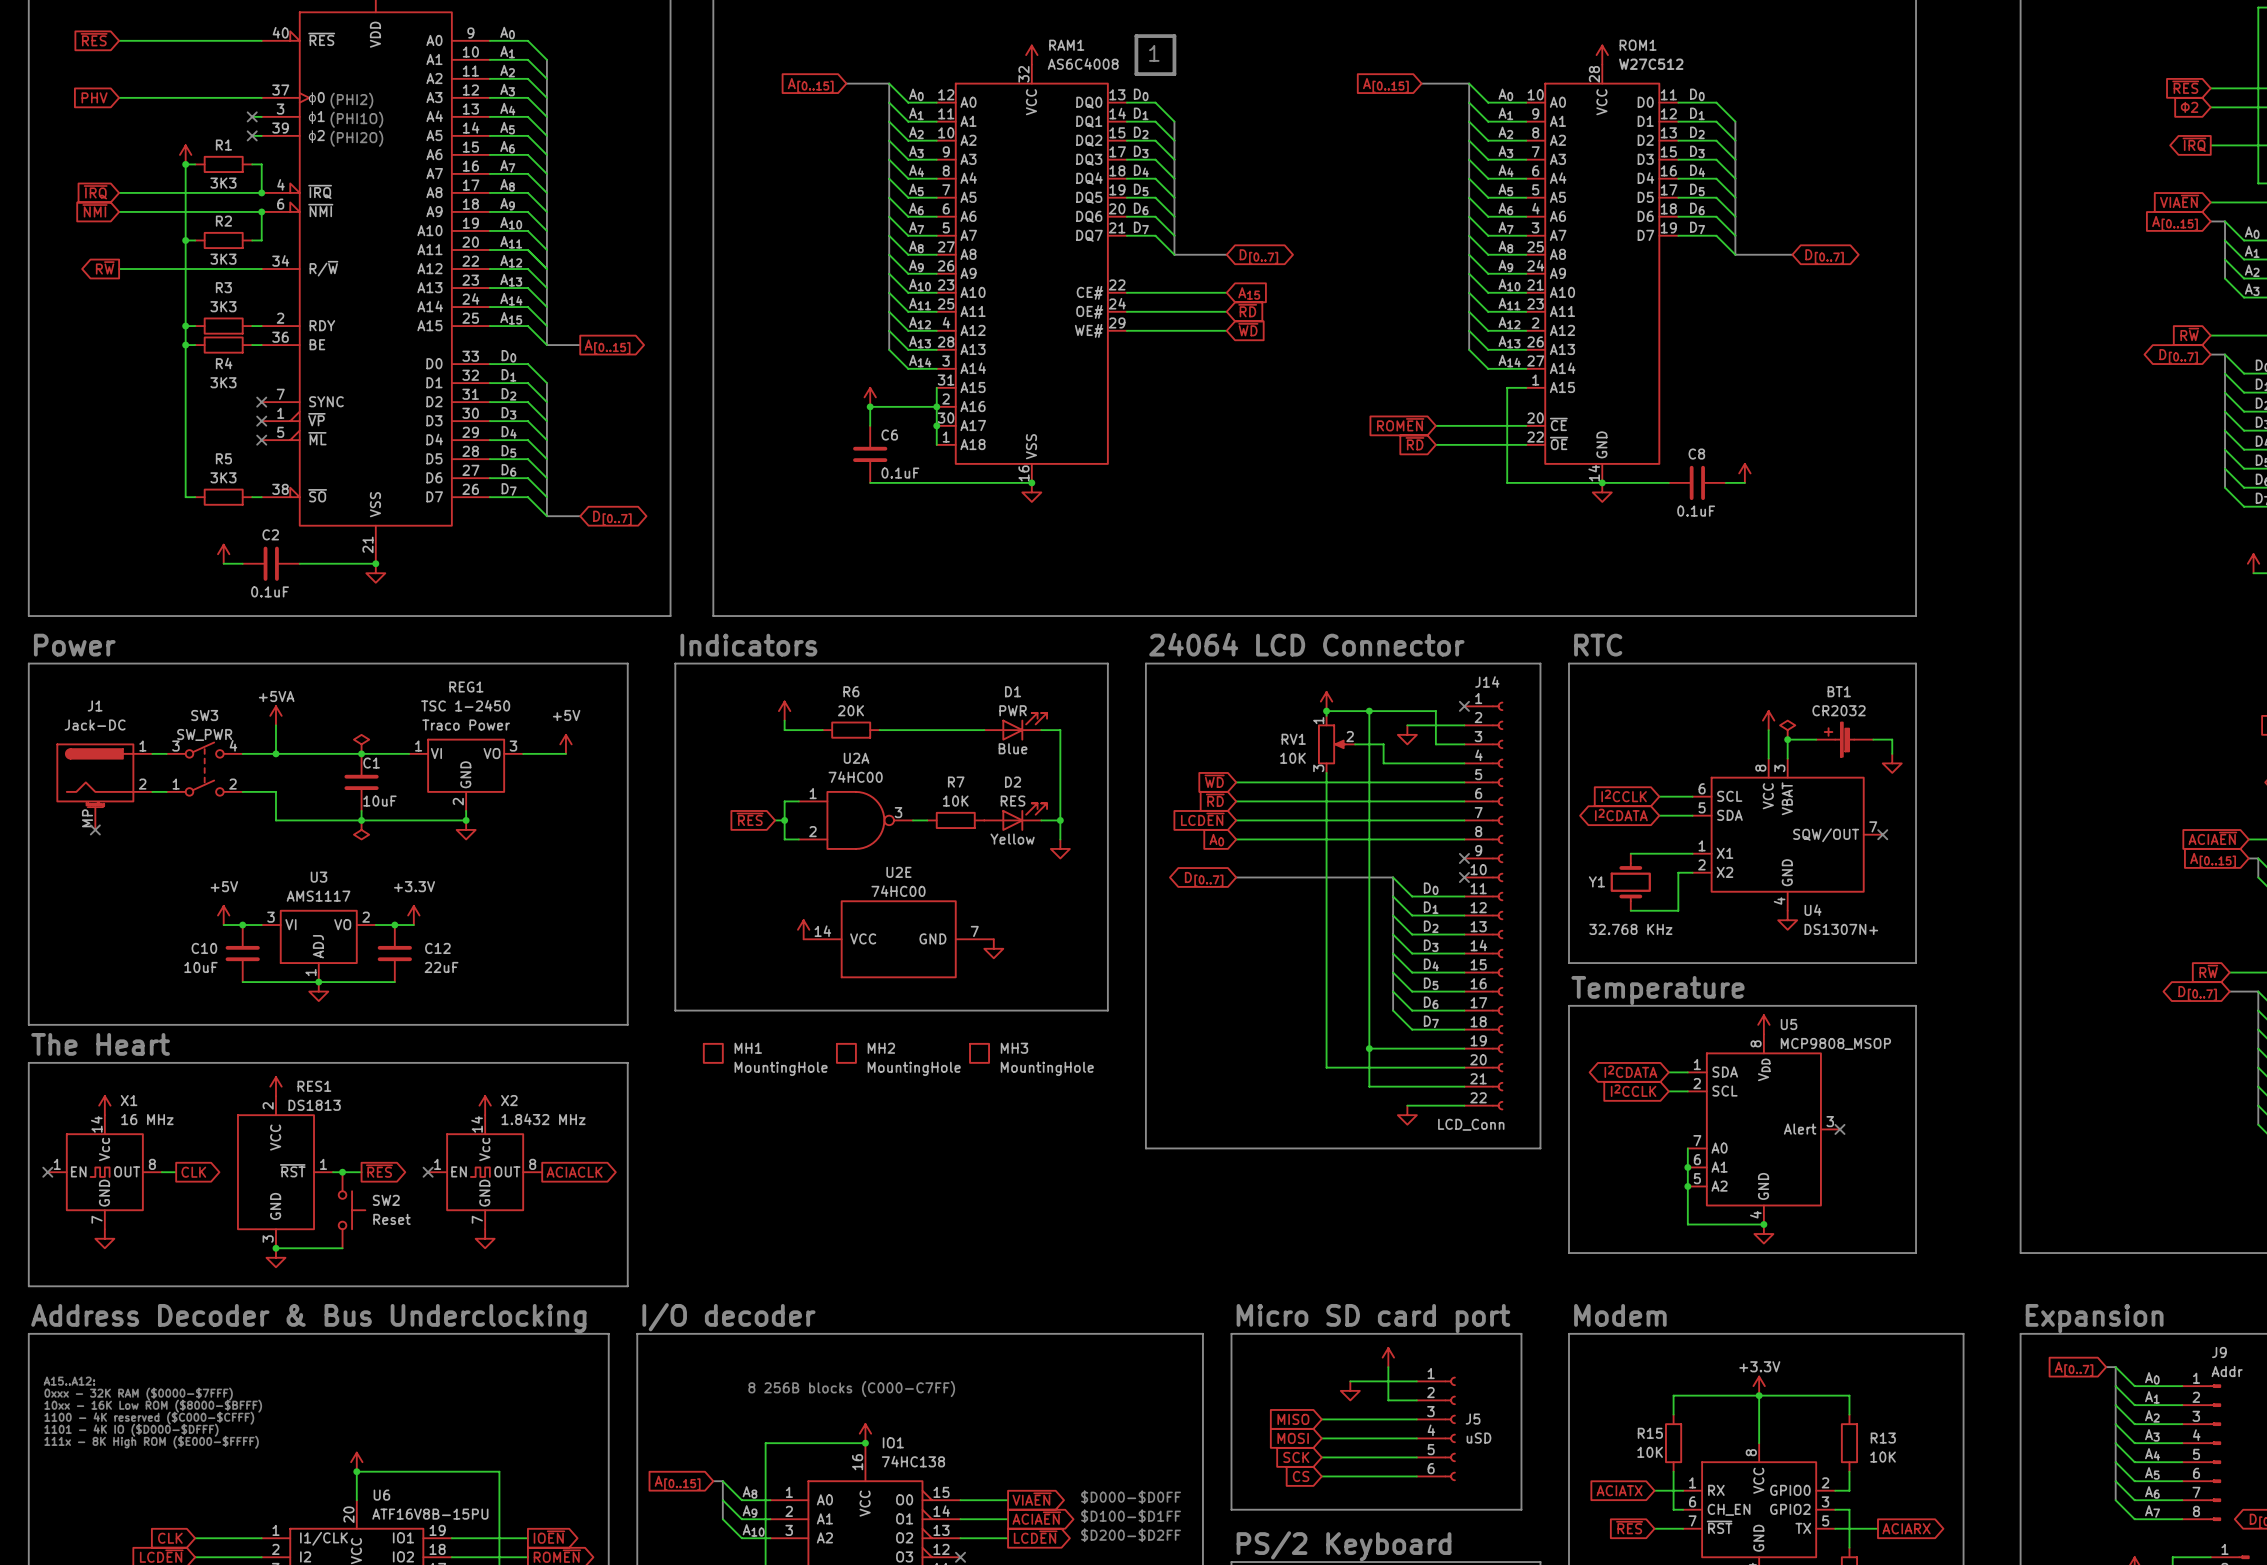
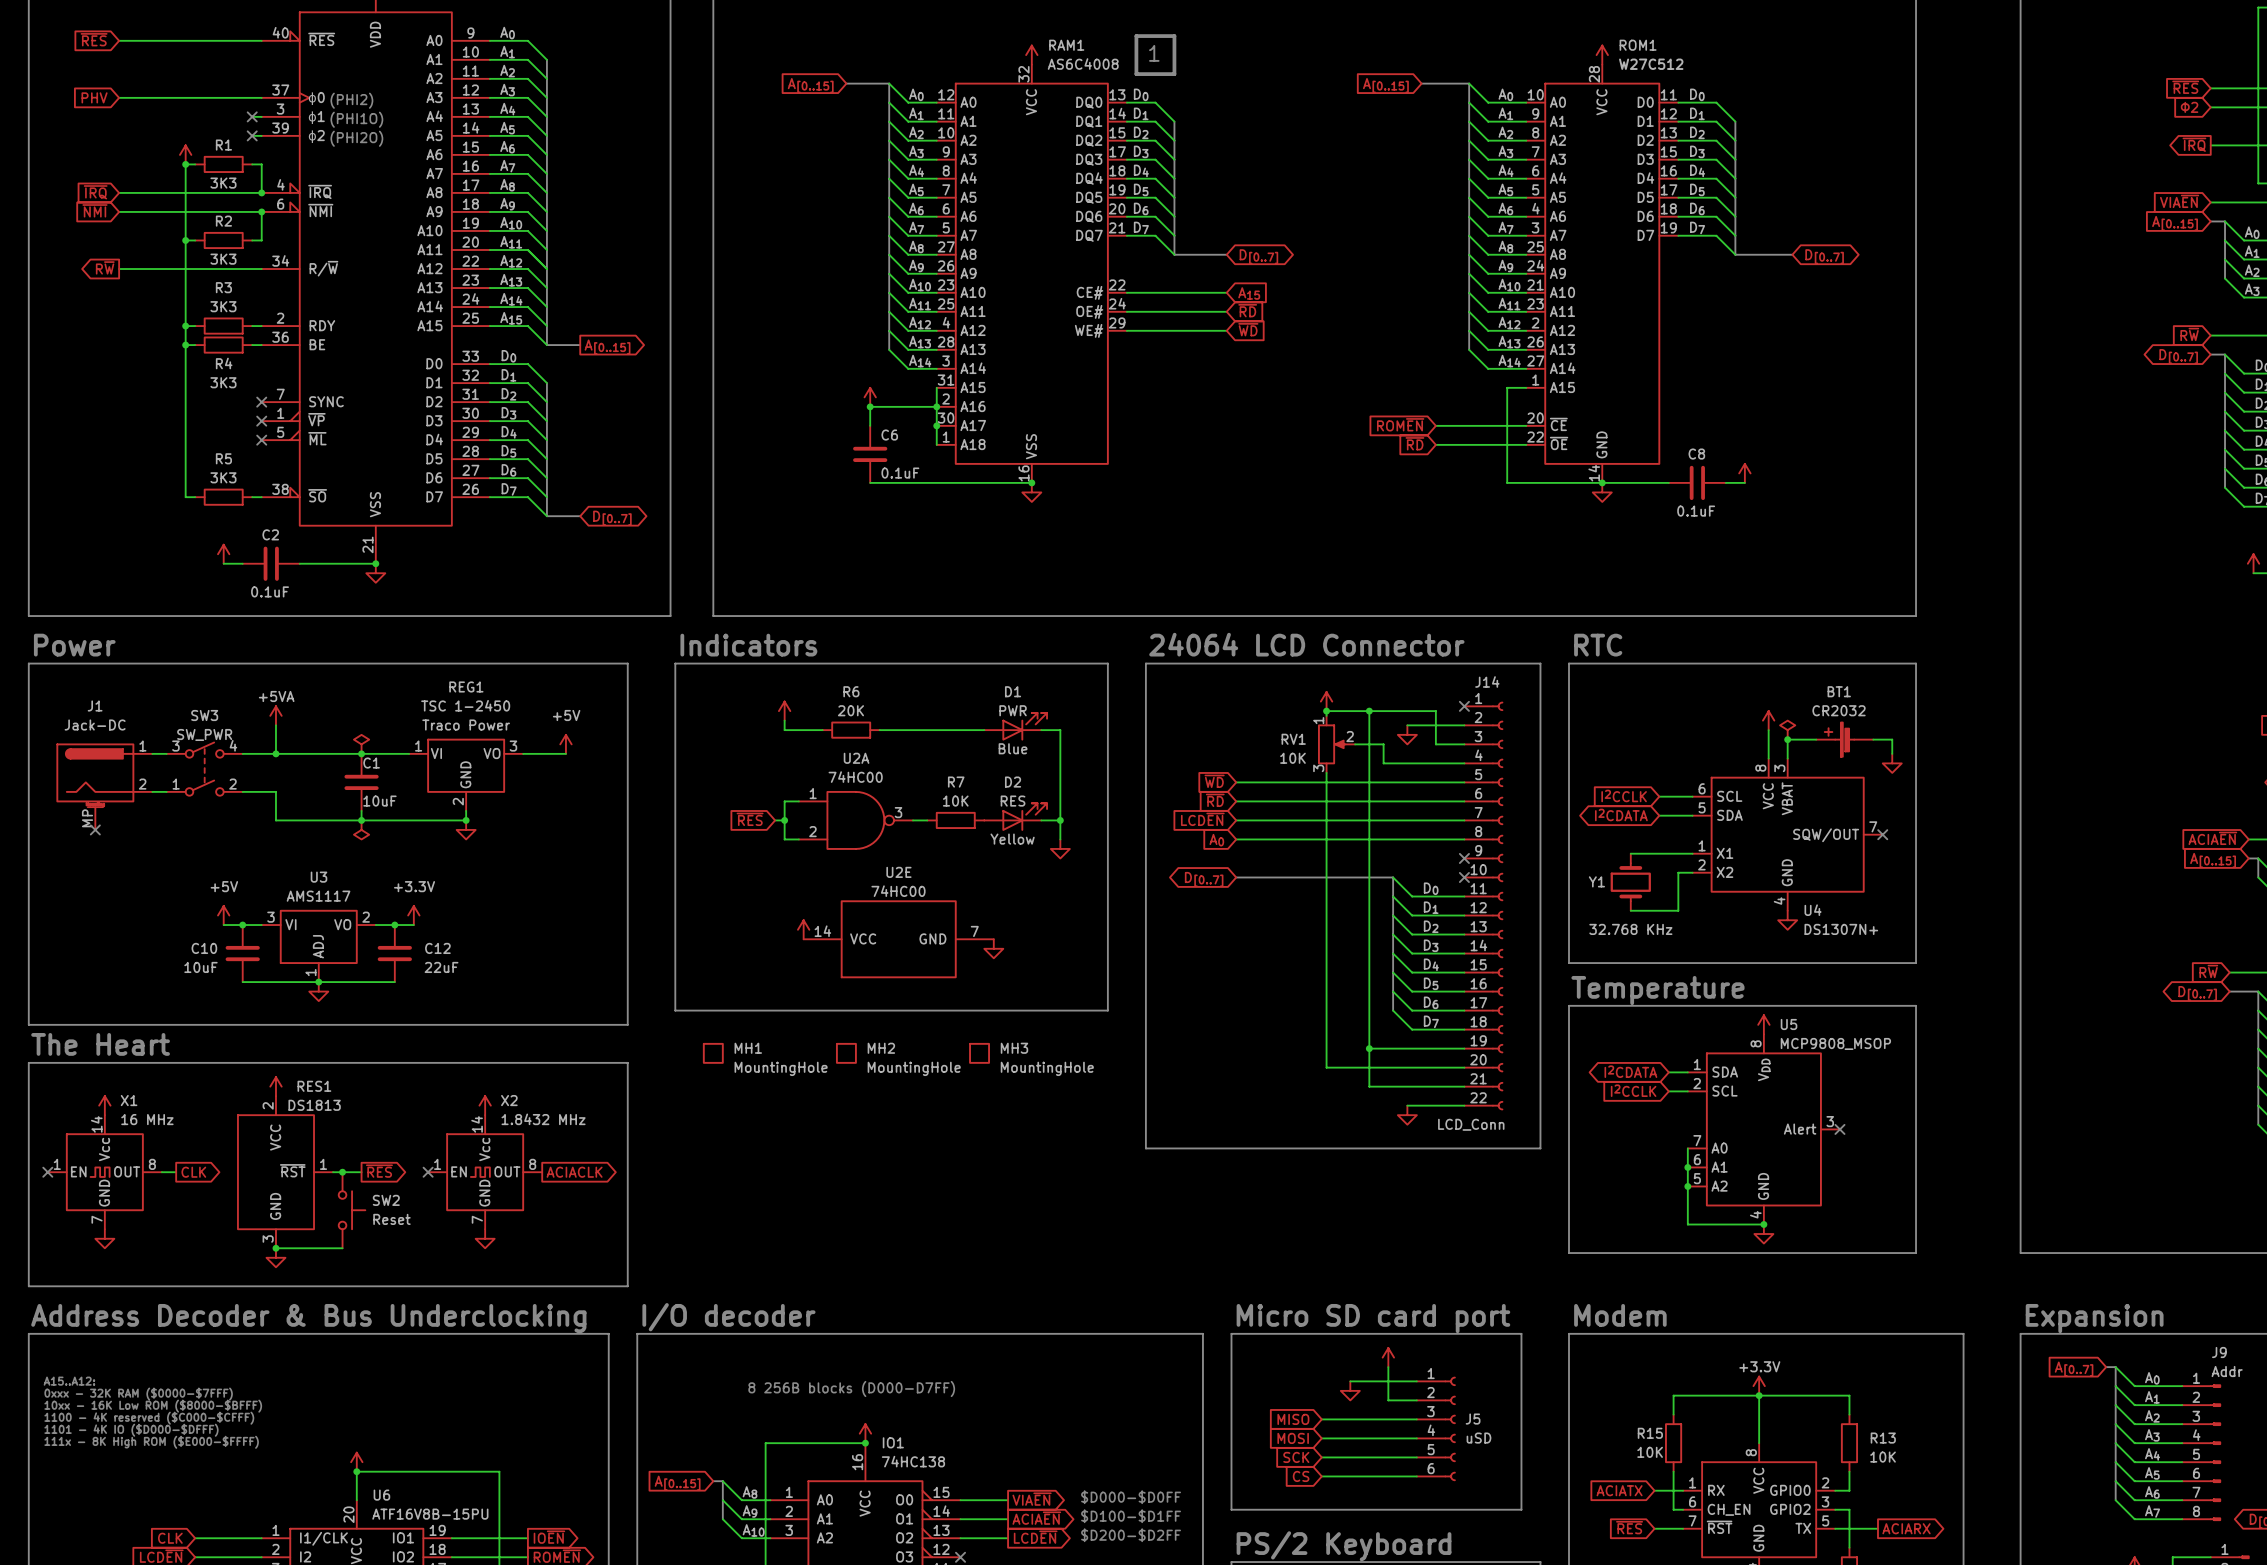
text: 8 256B blocks (C000-C7FF) (851, 1388) -> 8 256B blocks (D000-D7FF) (851, 1388)

